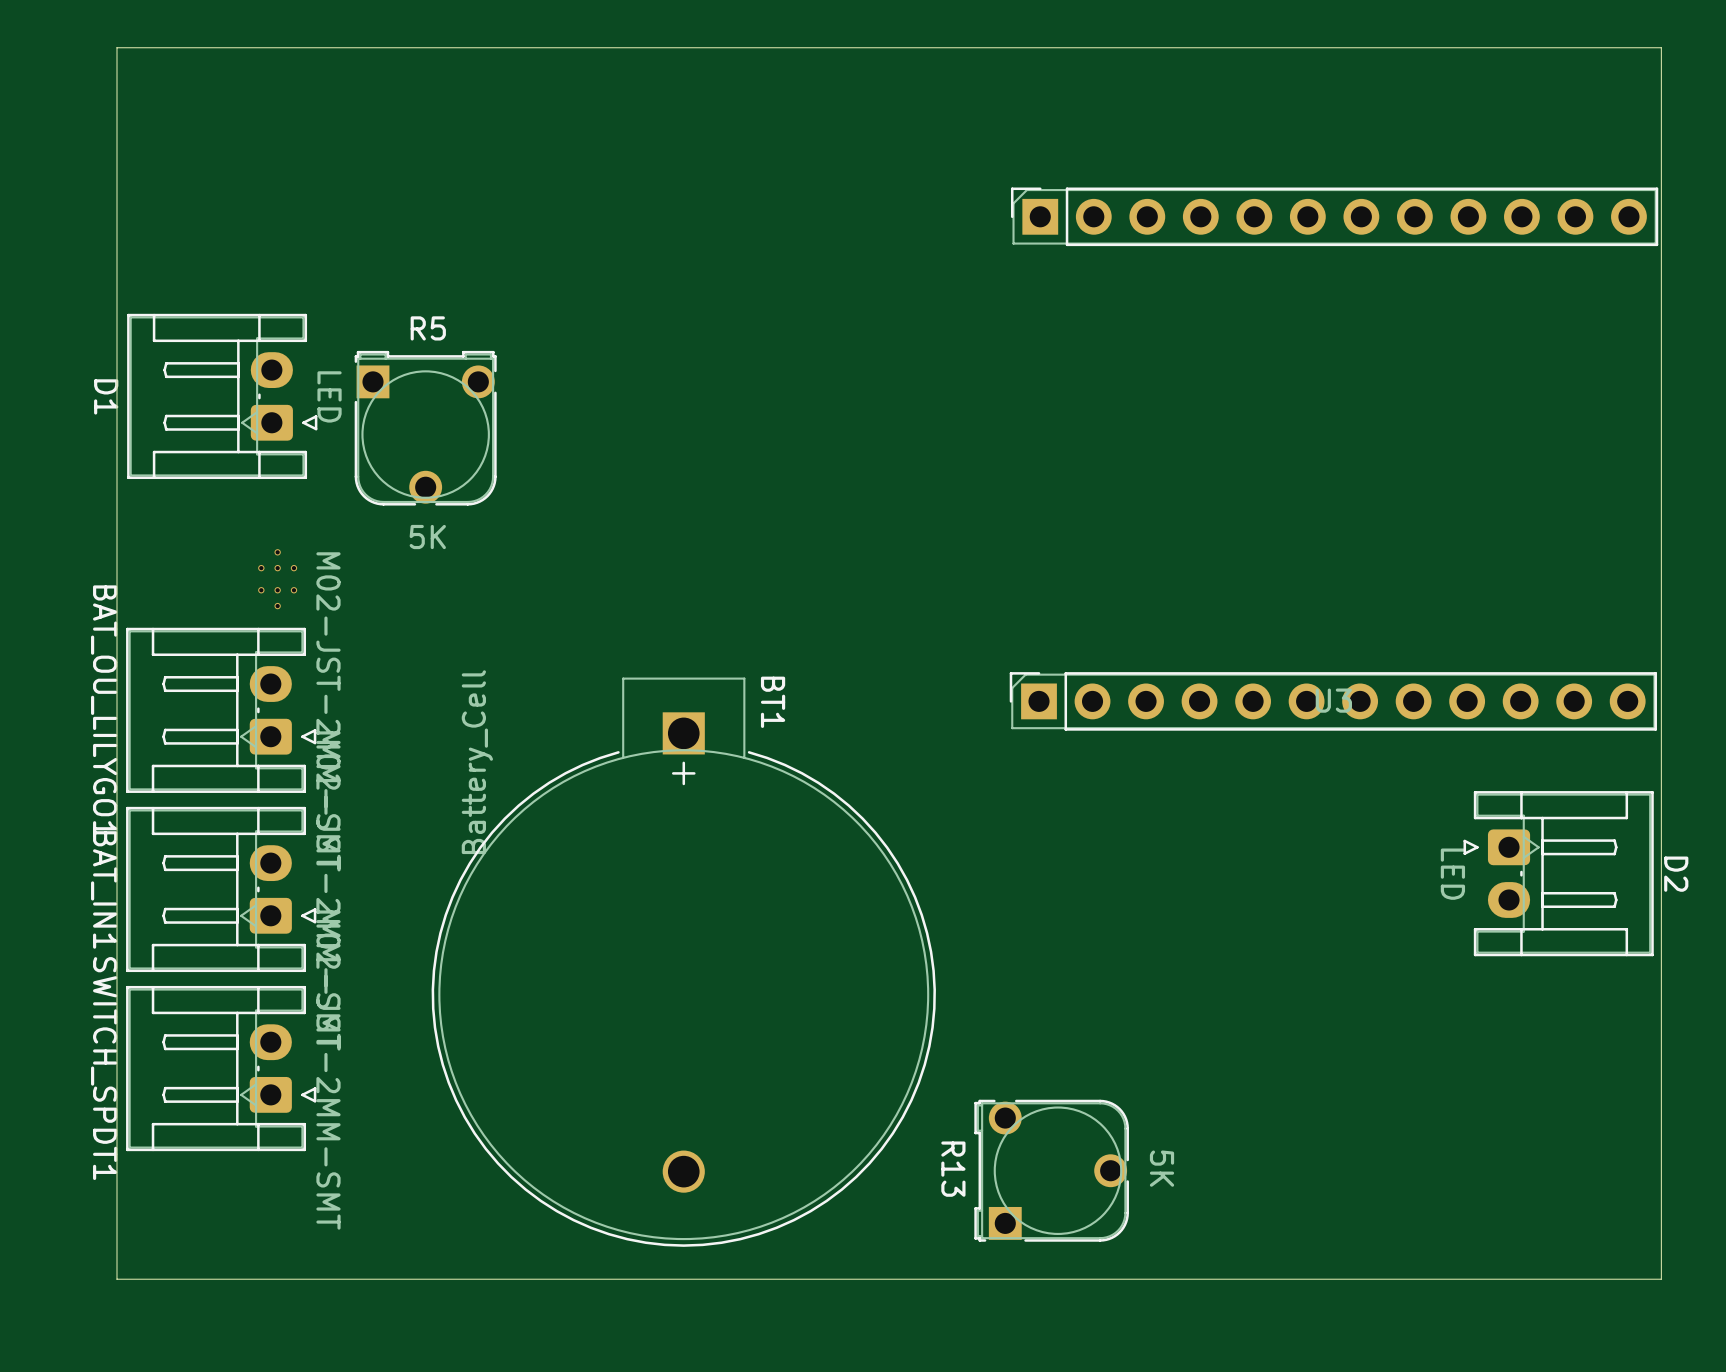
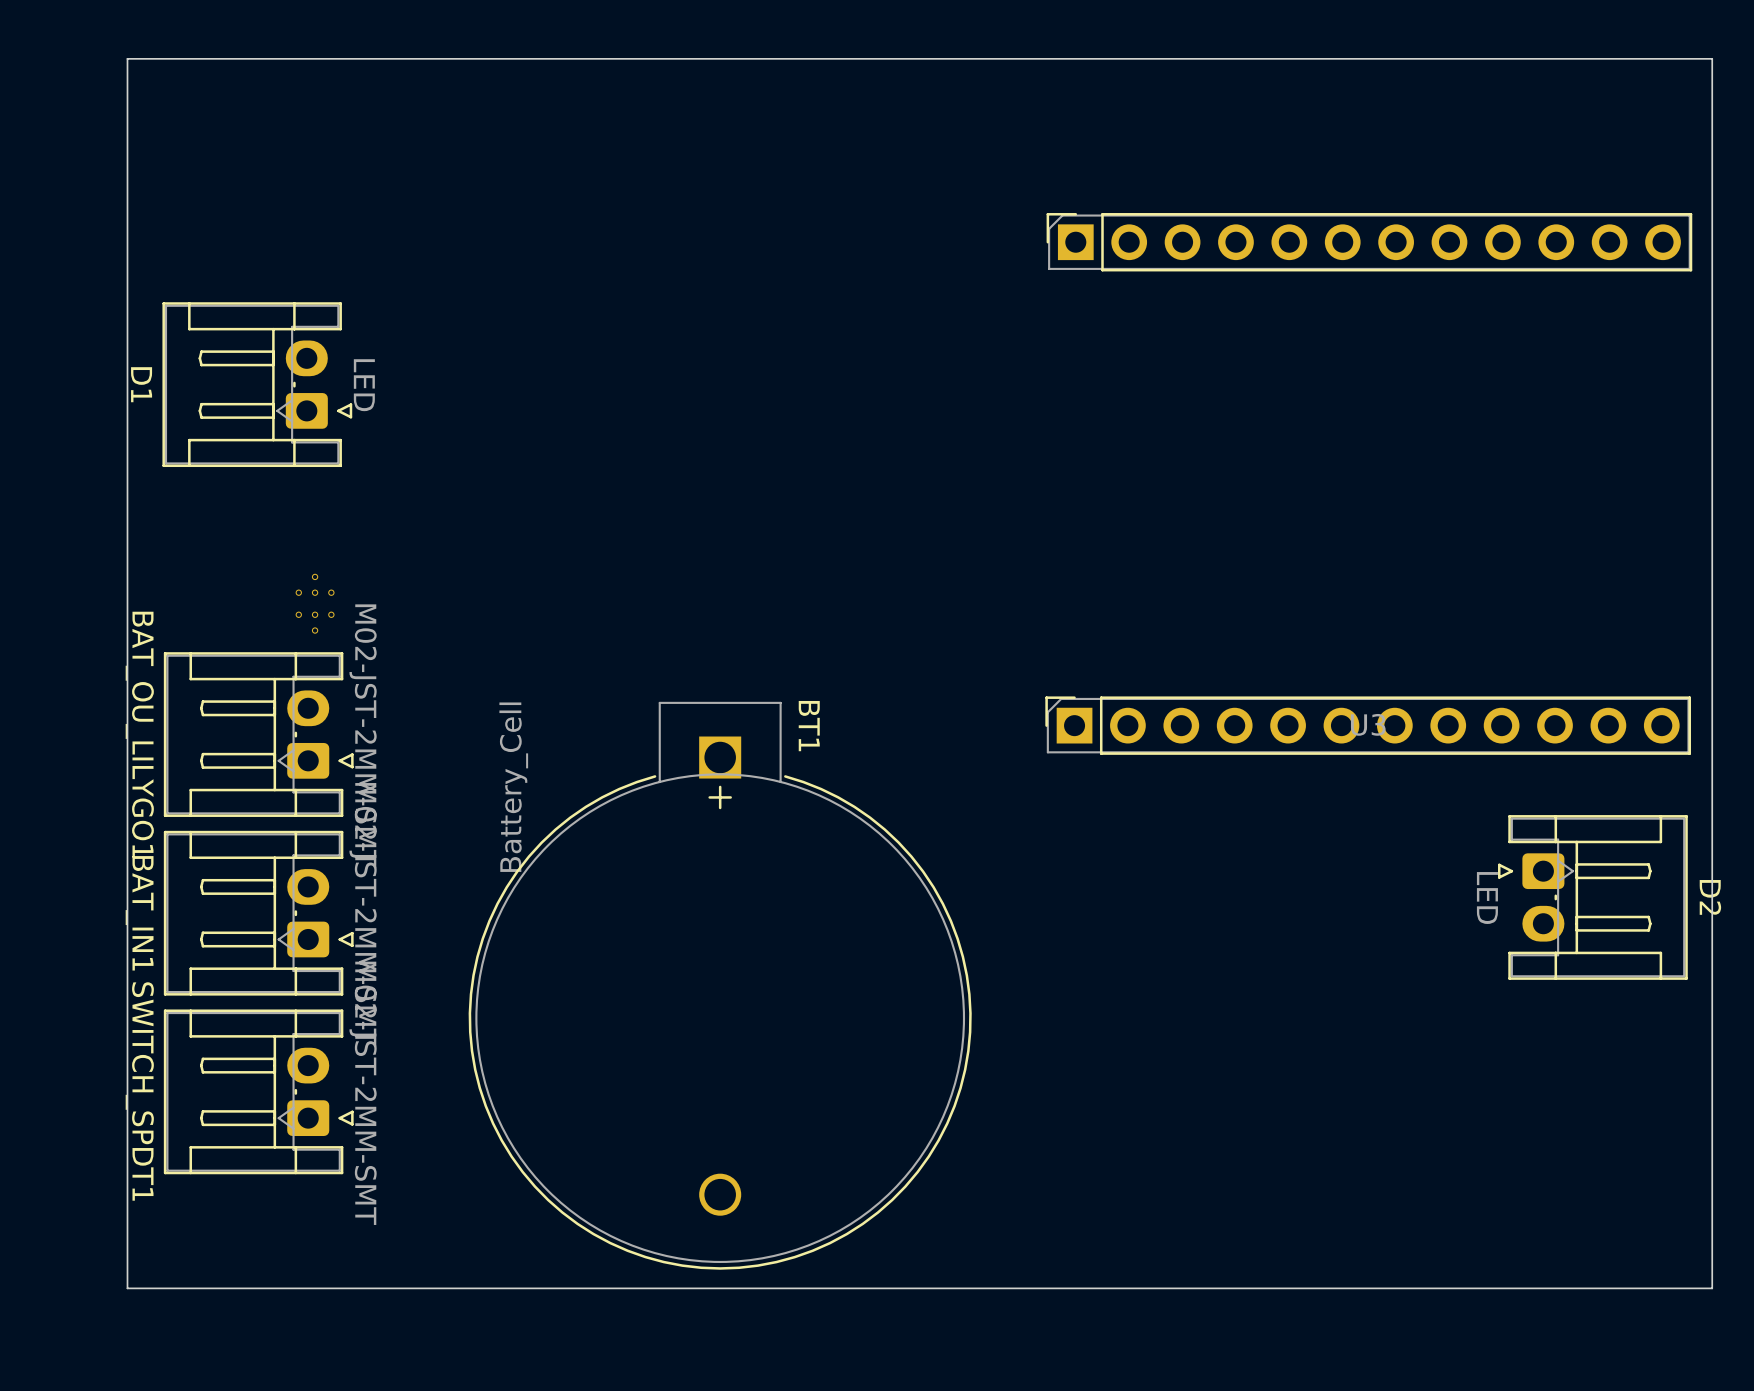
board edge: (1661, 47) (116, 47) (116, 1279) (1661, 1279) (1661, 47) -> (1712, 58) (1712, 1288) (127, 1288) (127, 58) (1712, 58)
D1 position: (222, 396) -> (257, 384)
R5: 5K (425, 428) -> none
R13: 5K (1051, 1170) -> none

